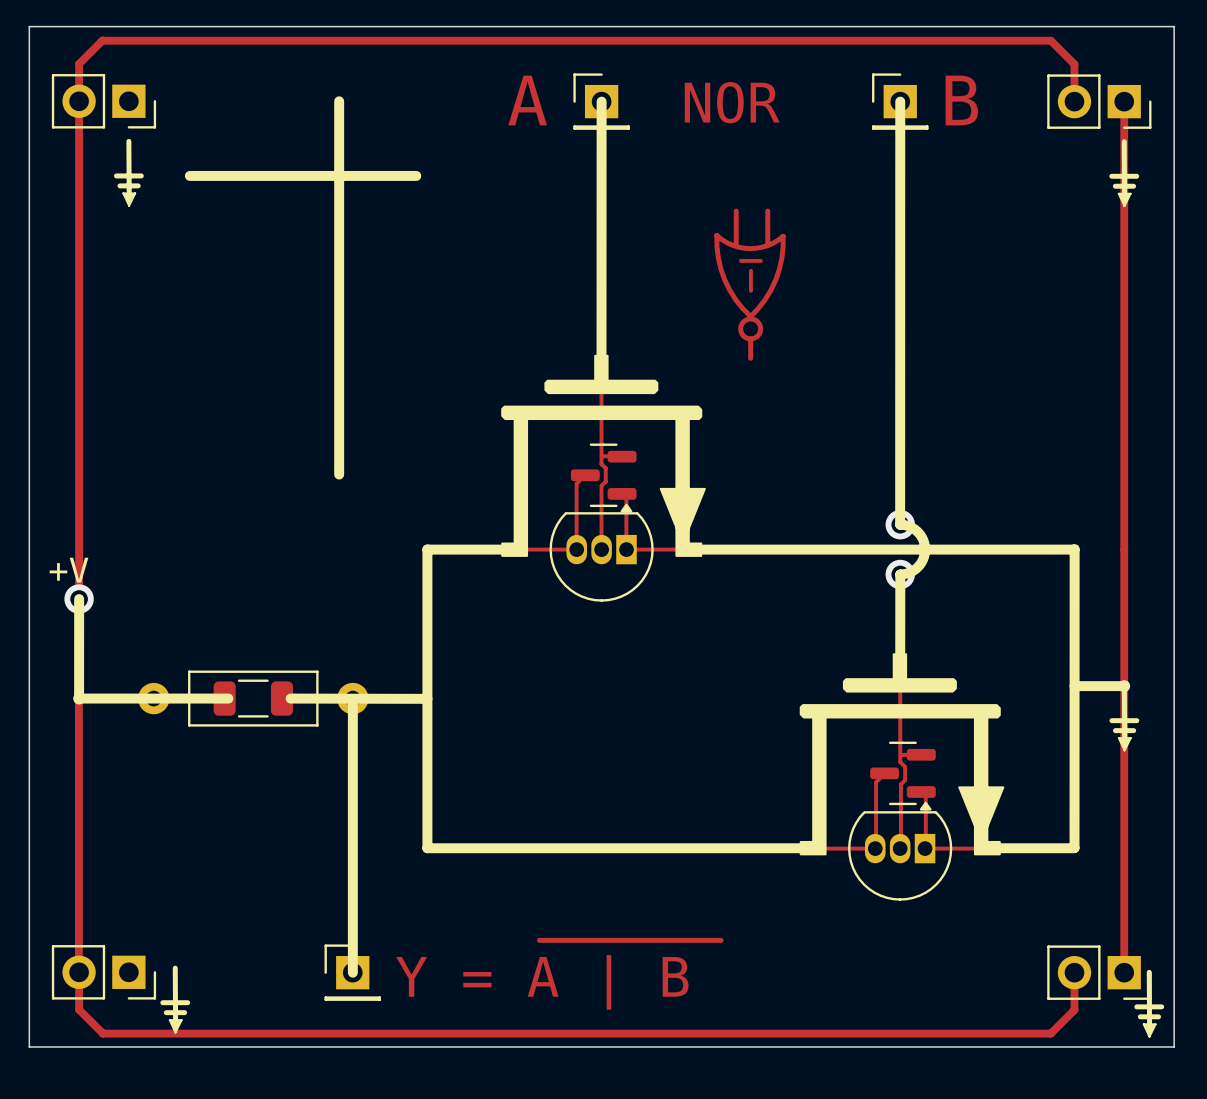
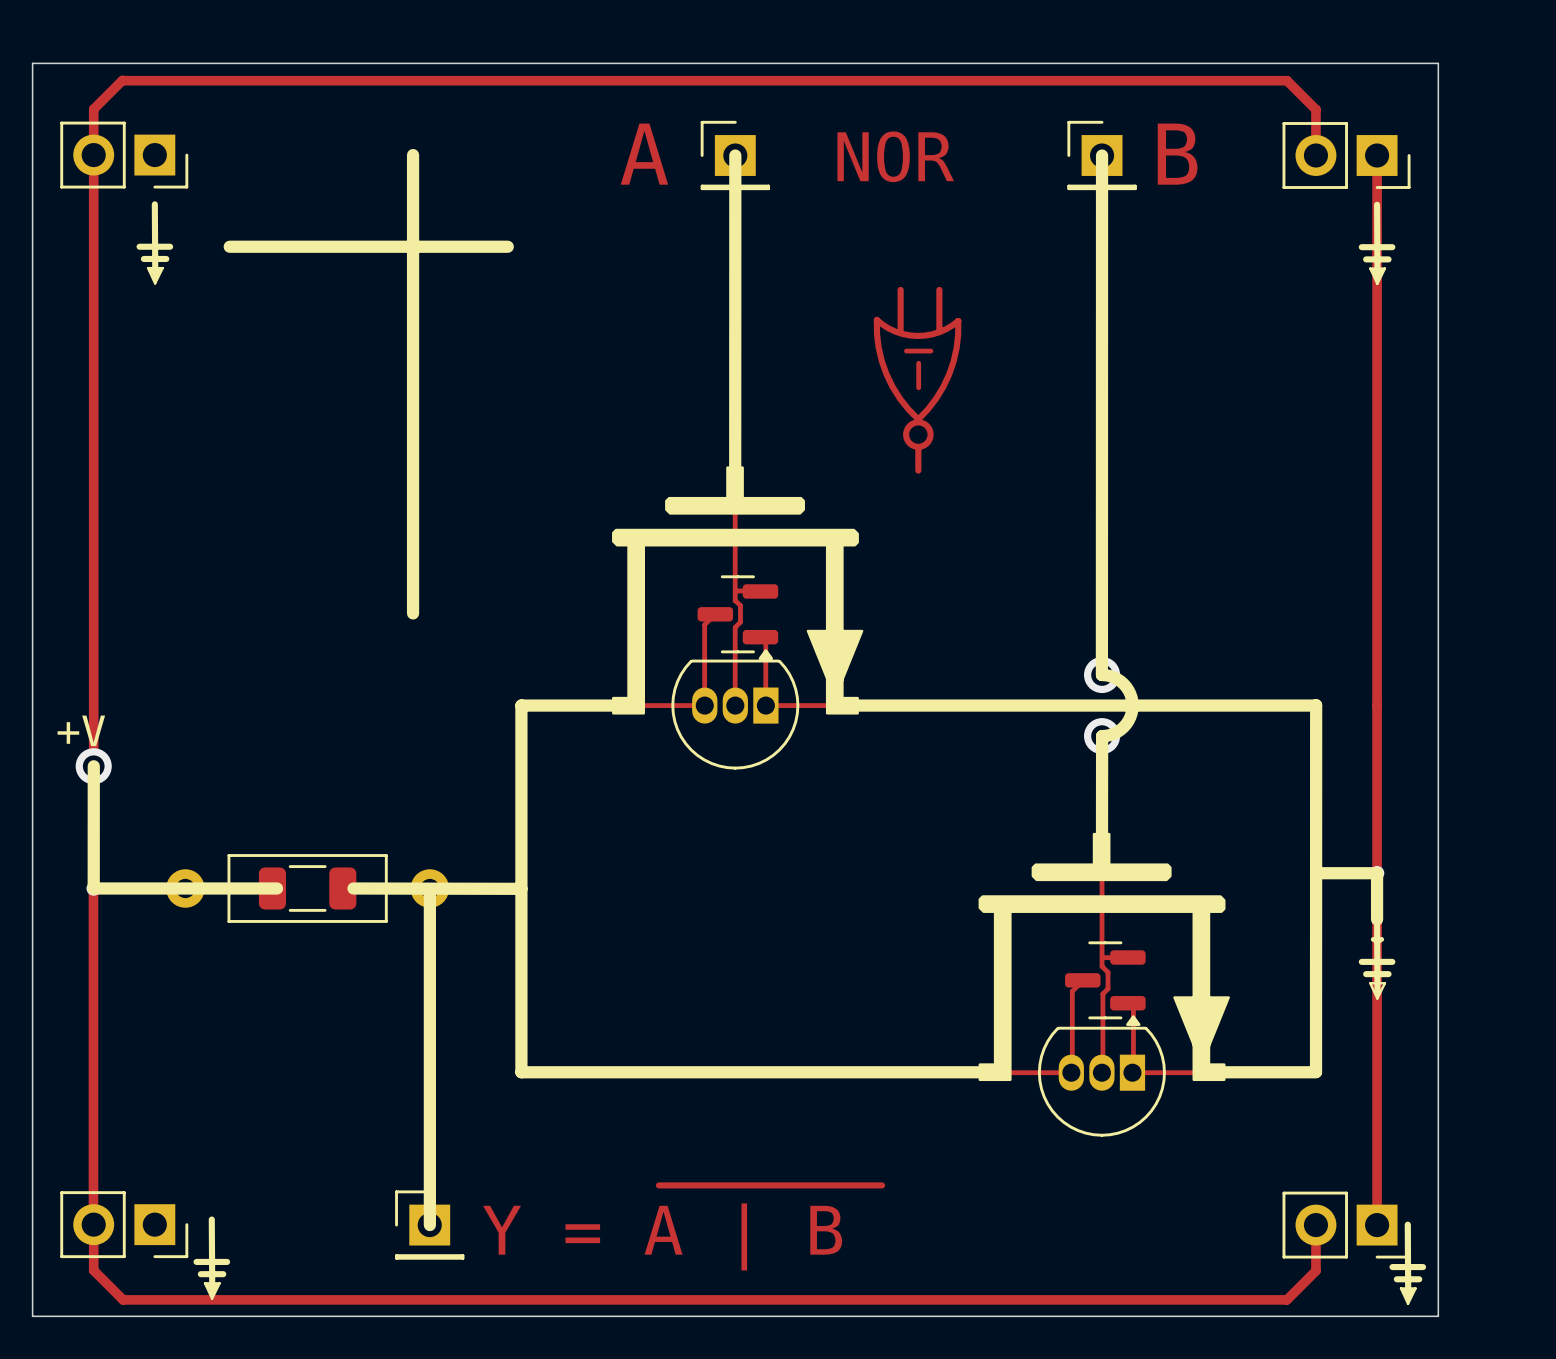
line: (1124, 686) (1124, 746) -> (1377, 873) (1377, 993)
line: (1111, 720) (1136, 720) -> (1361, 961) (1392, 961)
line: (1115, 730) (1133, 730) -> (1366, 974) (1388, 974)
line: (1118, 738) (1124, 750) (1130, 738) (1118, 738) -> (1370, 983) (1377, 998) (1384, 983) (1370, 983)

